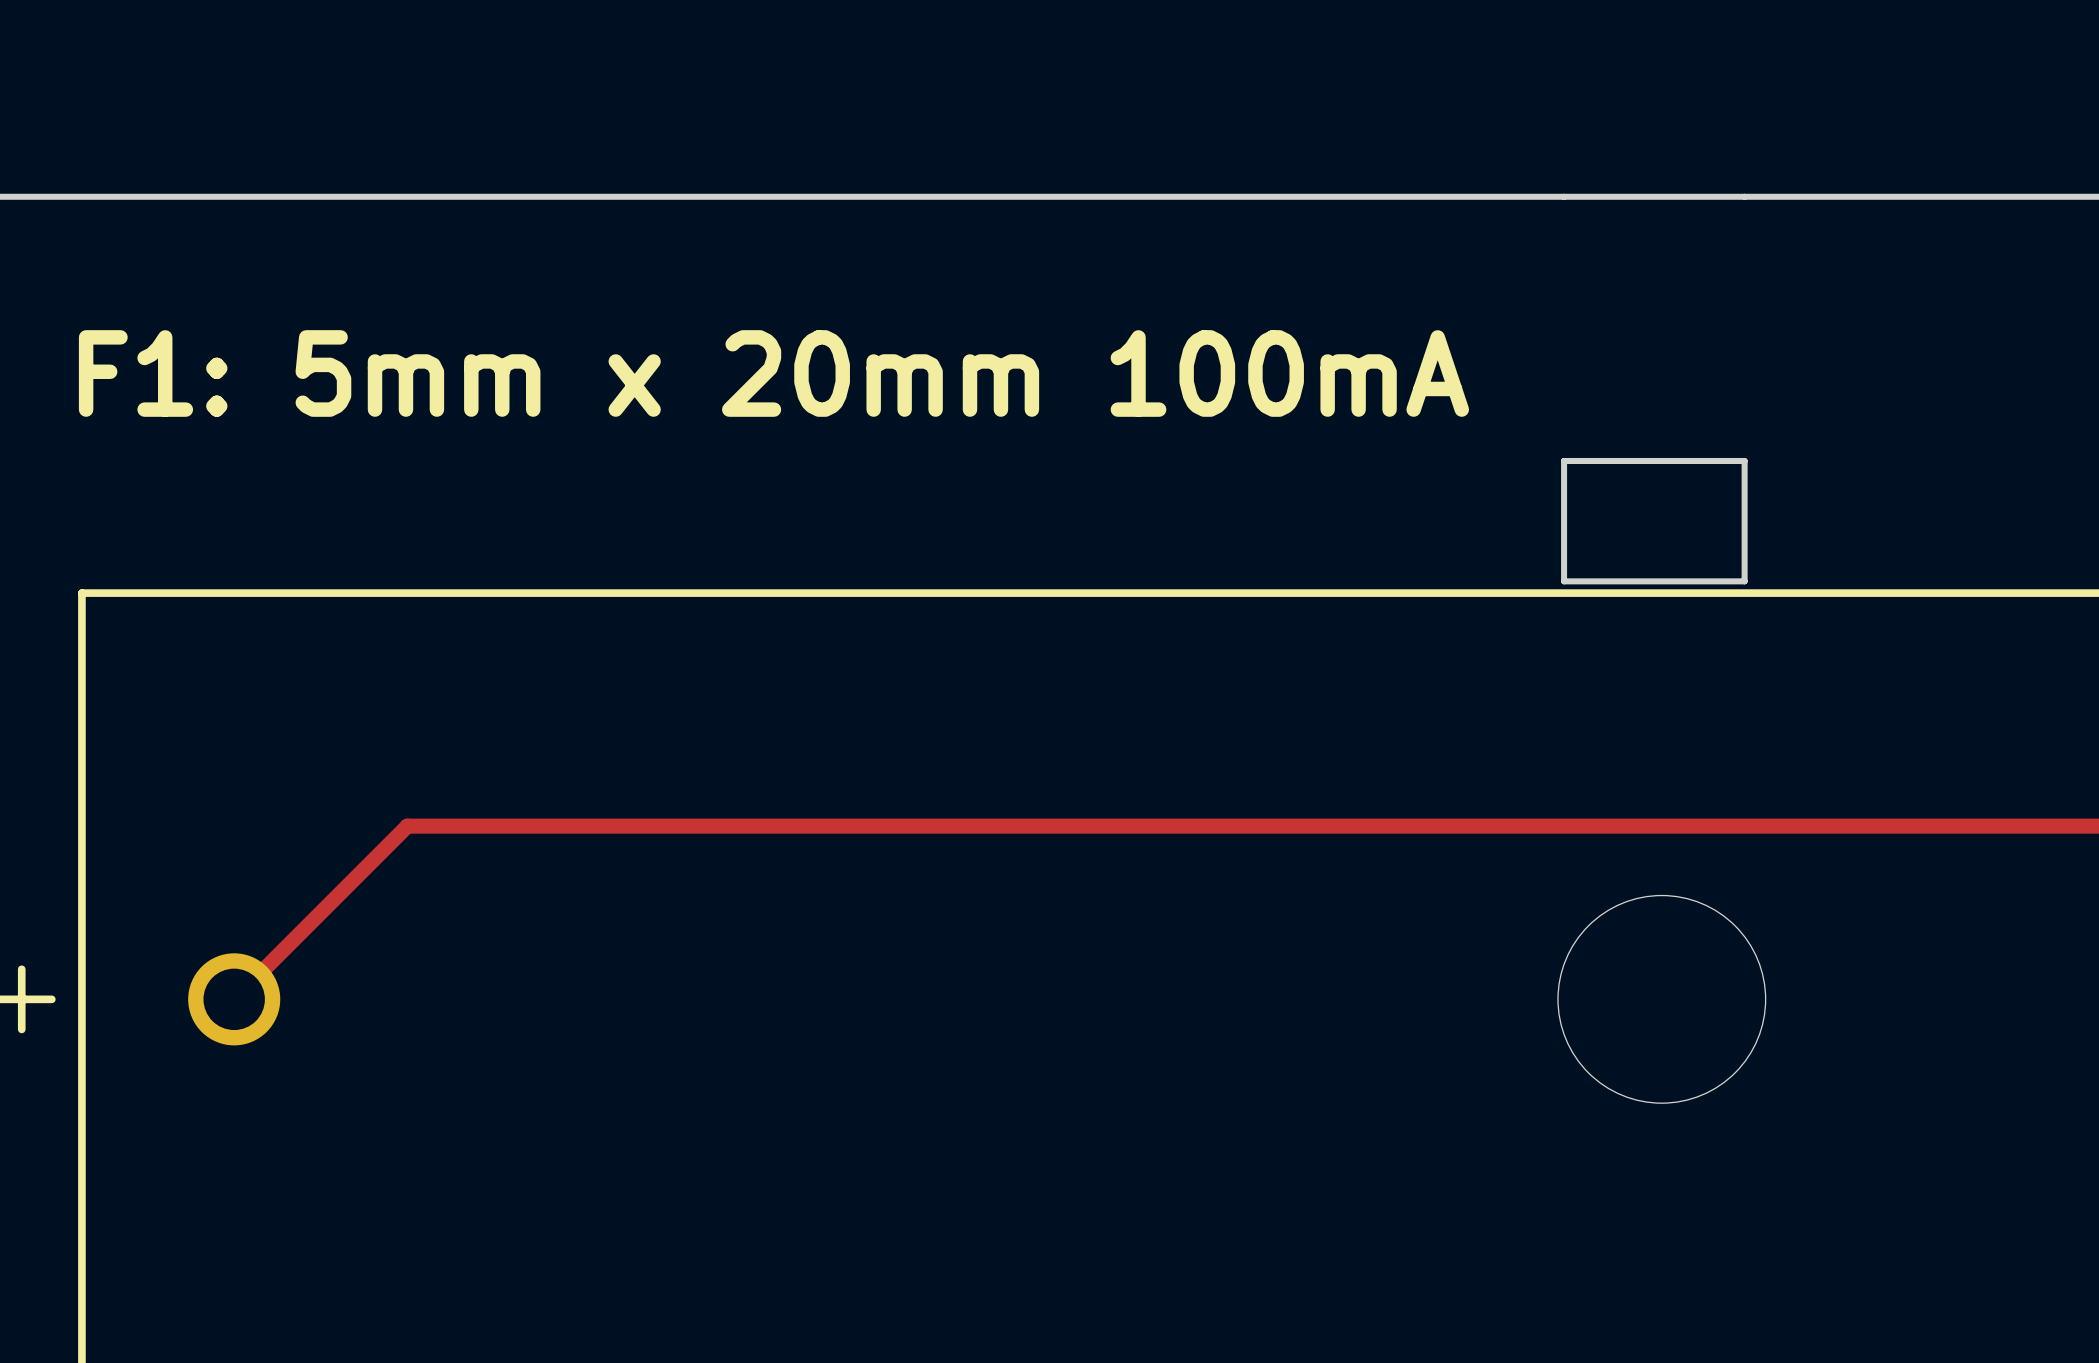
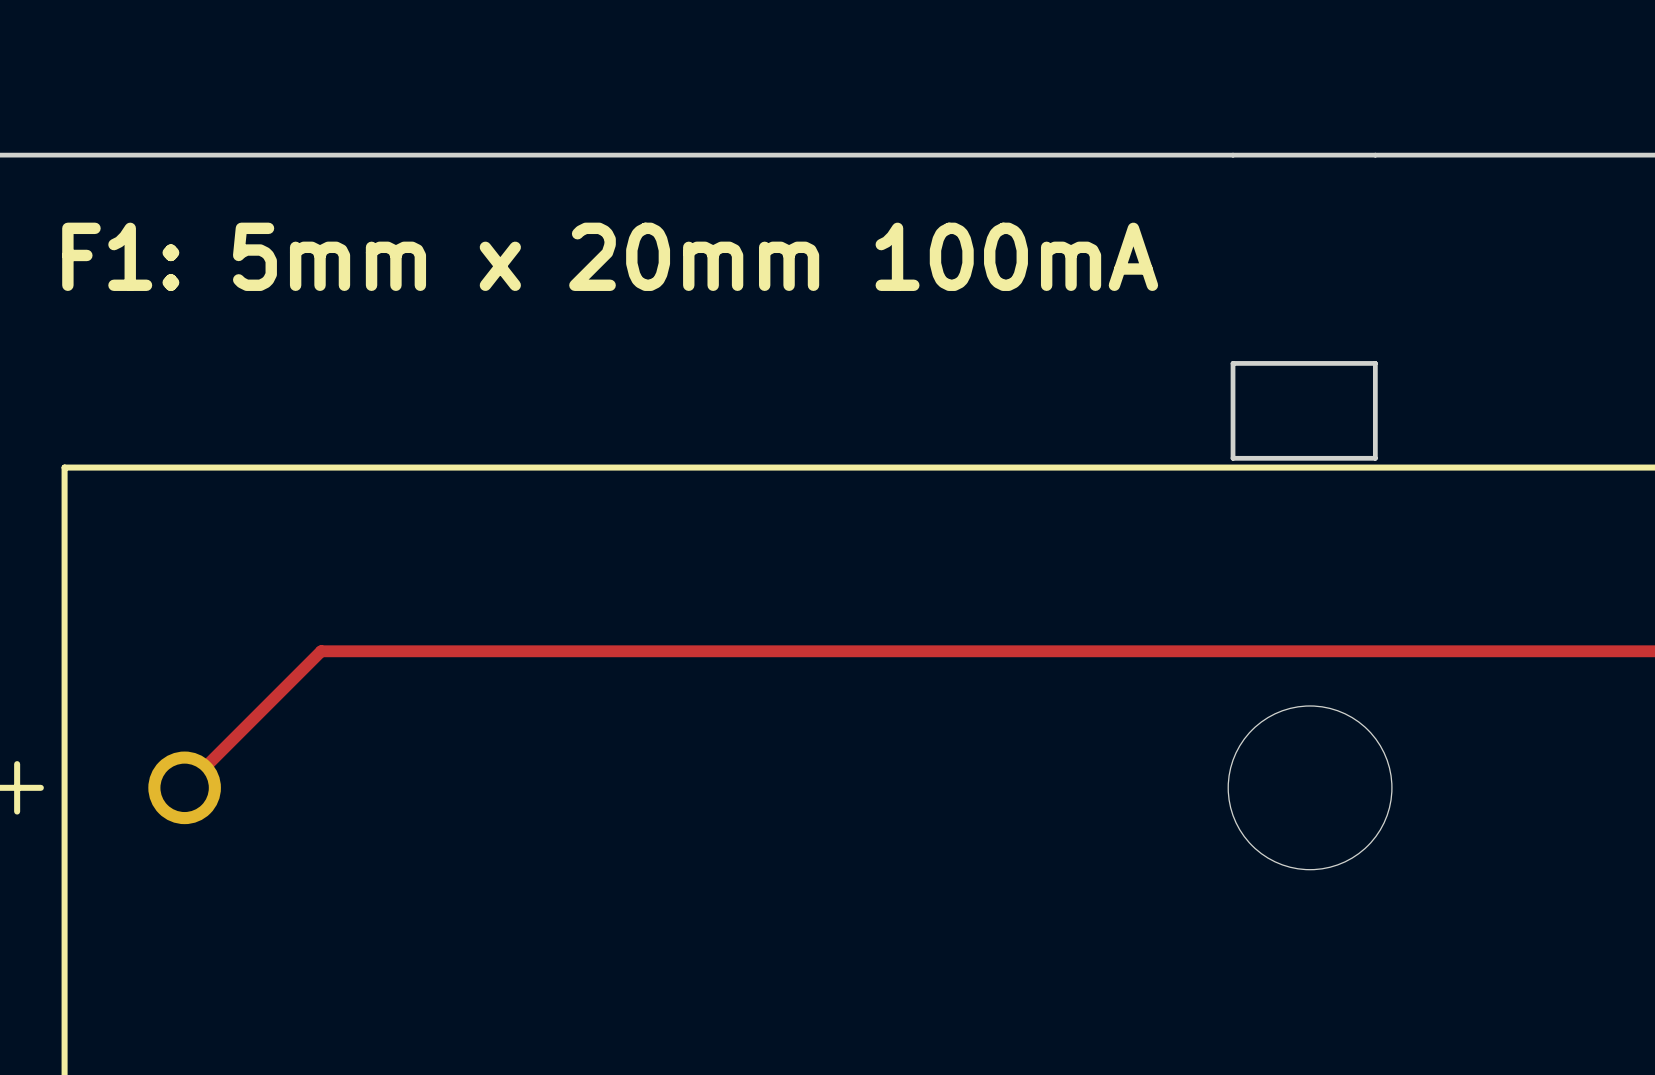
text position: F1: 5mm x 20mm 100mA (773, 373) -> F1: 5mm x 20mm 100mA (610, 256)

